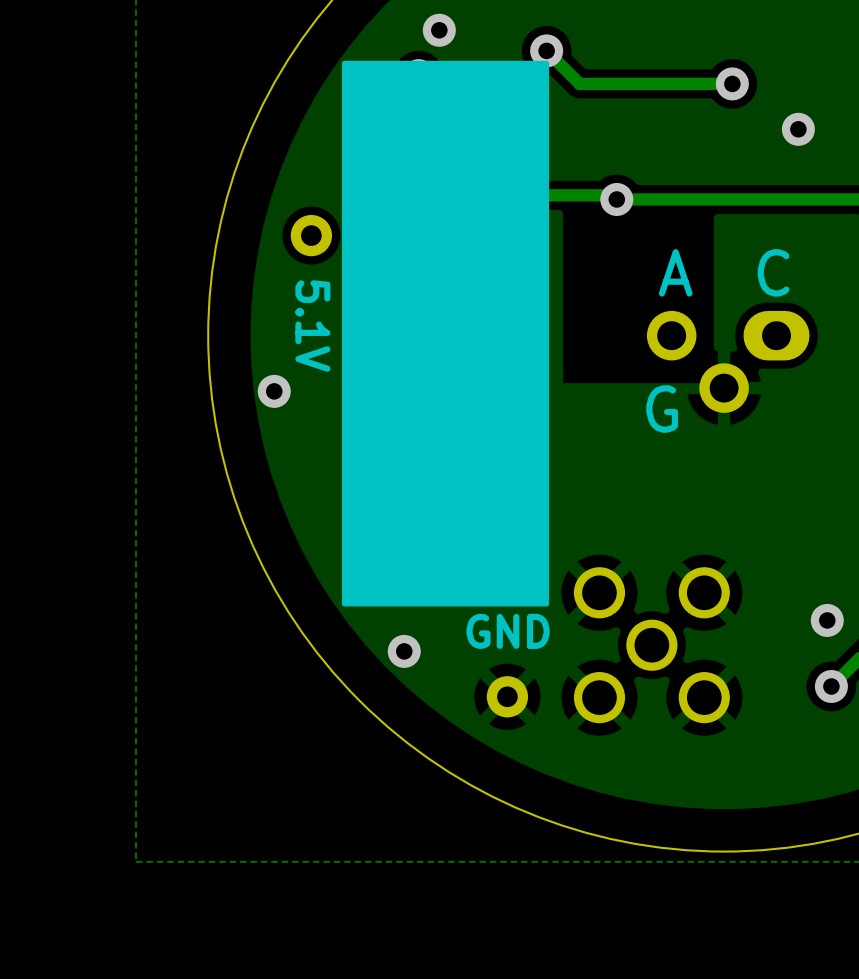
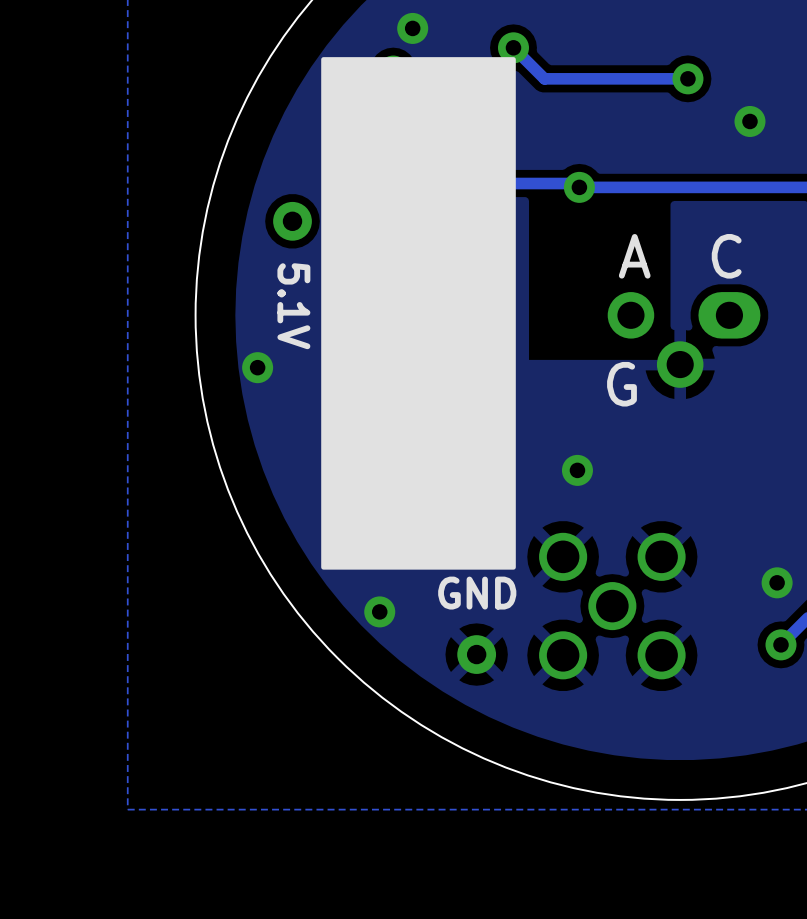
via: none -> (577, 470)

